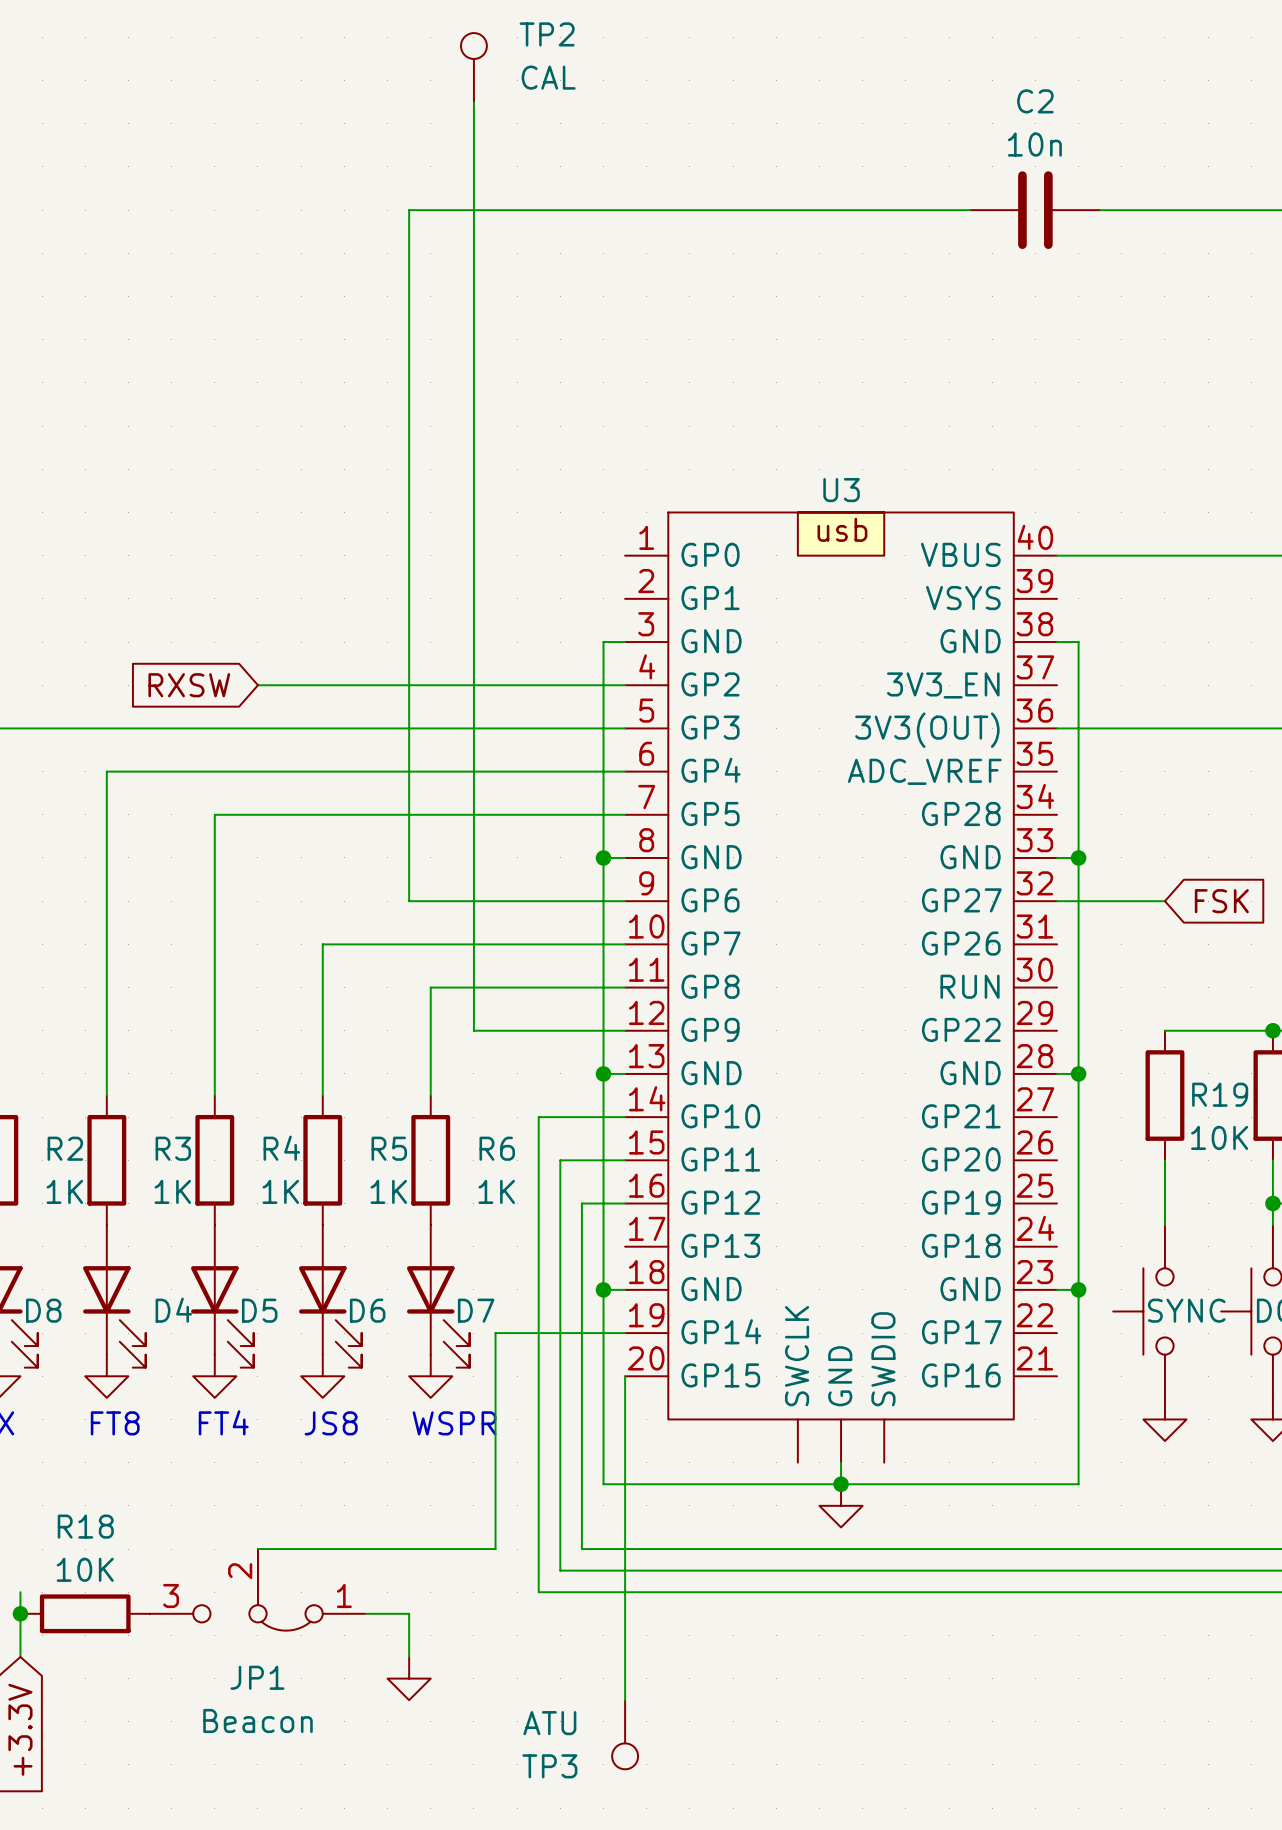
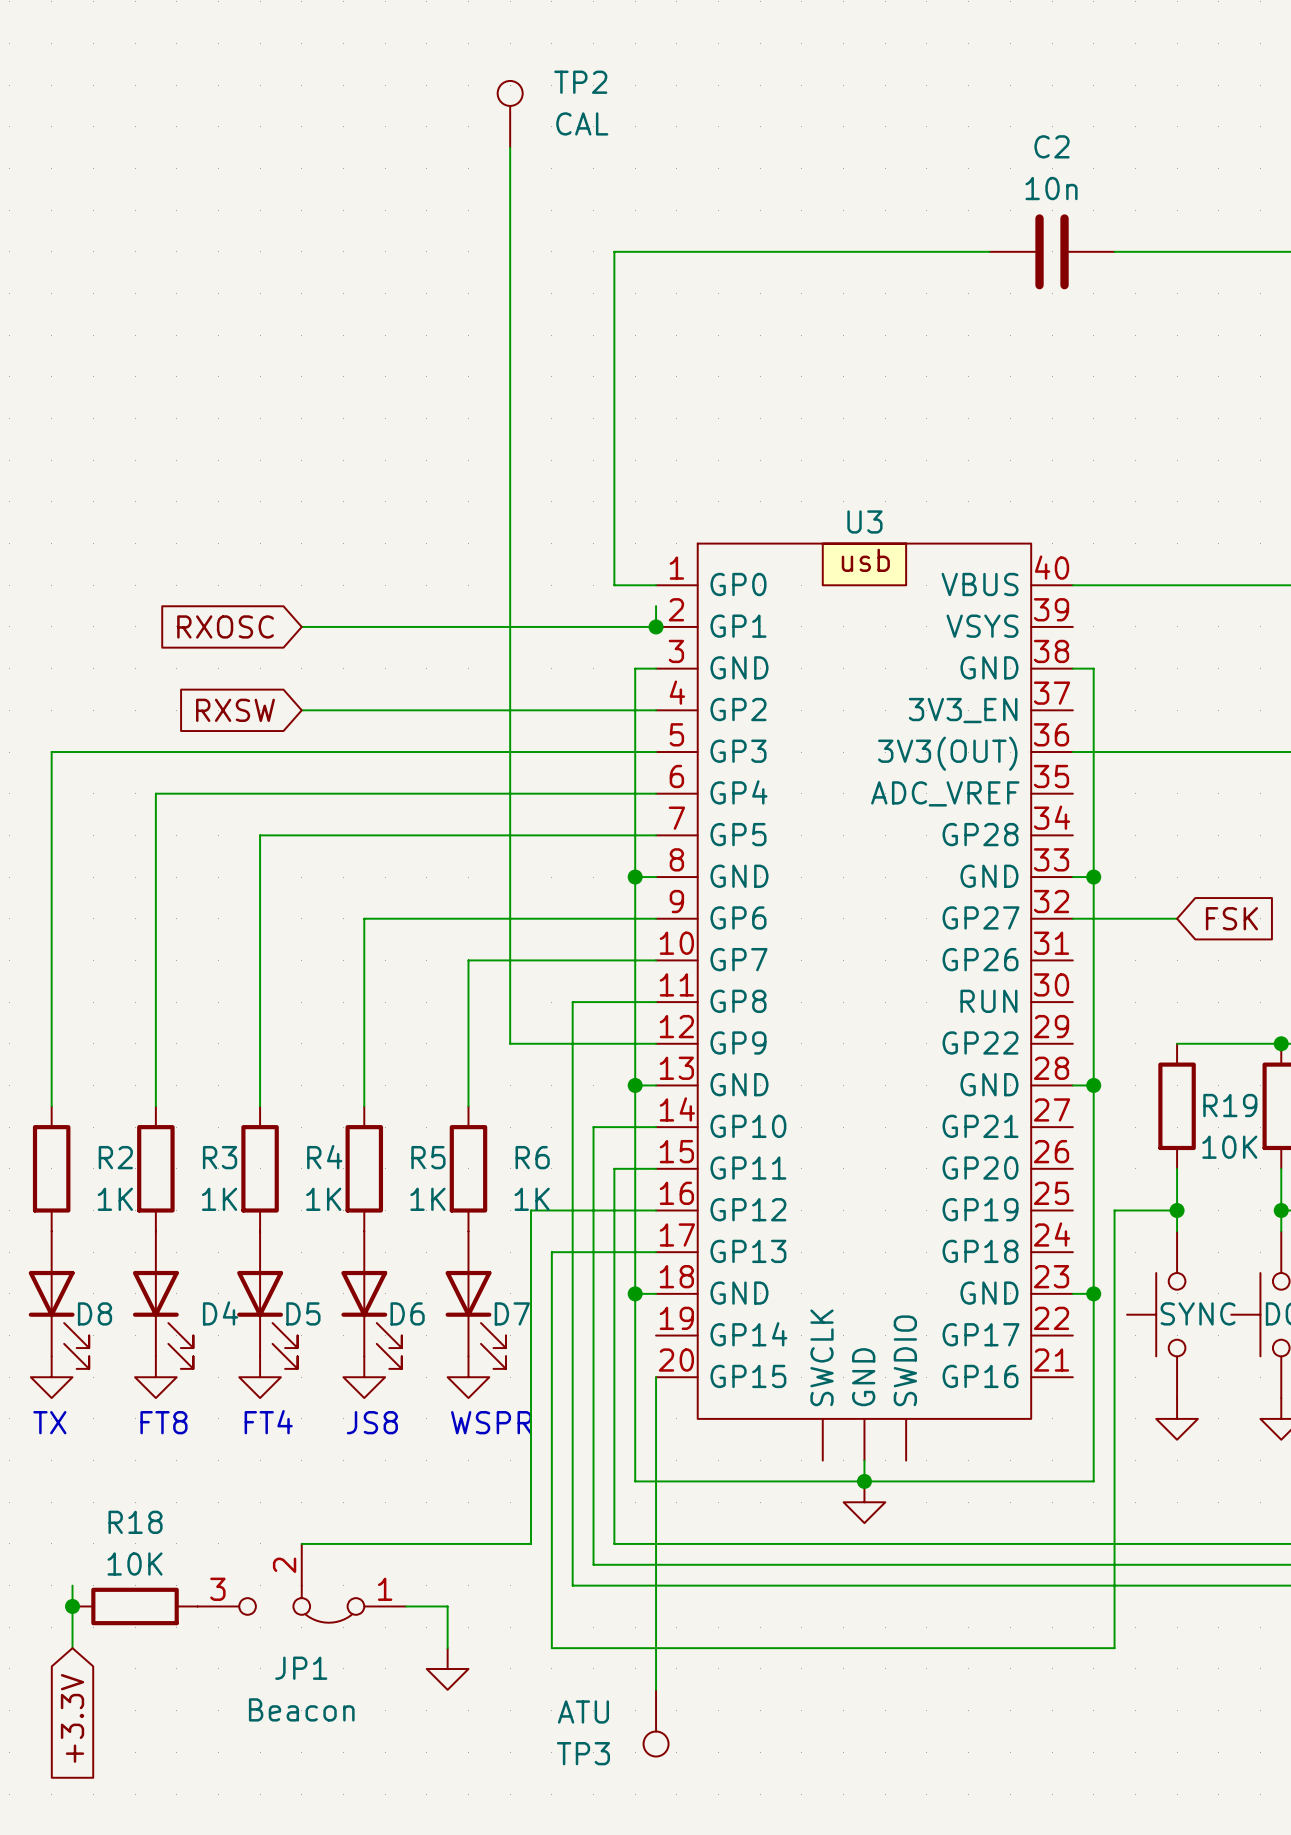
wire: (581, 210) (409, 210) (409, 901) -> (614, 251) (614, 585) (656, 585)
wire: none -> (656, 606) (656, 626) (301, 626)
global label: none -> RXOSC (225, 626)
junction: none -> (656, 626)
wire: (322, 944) (430, 944) -> (364, 960) (364, 918) (447, 918)
wire: (430, 987) (538, 987) -> (468, 1002) (468, 960)
wire: none -> (572, 1002) (572, 1127)
wire: (538, 1117) (560, 1117) -> (593, 1168) (593, 1127)
wire: (560, 1160) (581, 1160) -> none
wire: none -> (1177, 1210) (1114, 1210) (1114, 1648) (551, 1648) (551, 1252) (656, 1252)
junction: none -> (1177, 1210)
wire: (495, 1333) (625, 1333) -> (531, 1335) (531, 1210) (614, 1210) (614, 1168)

